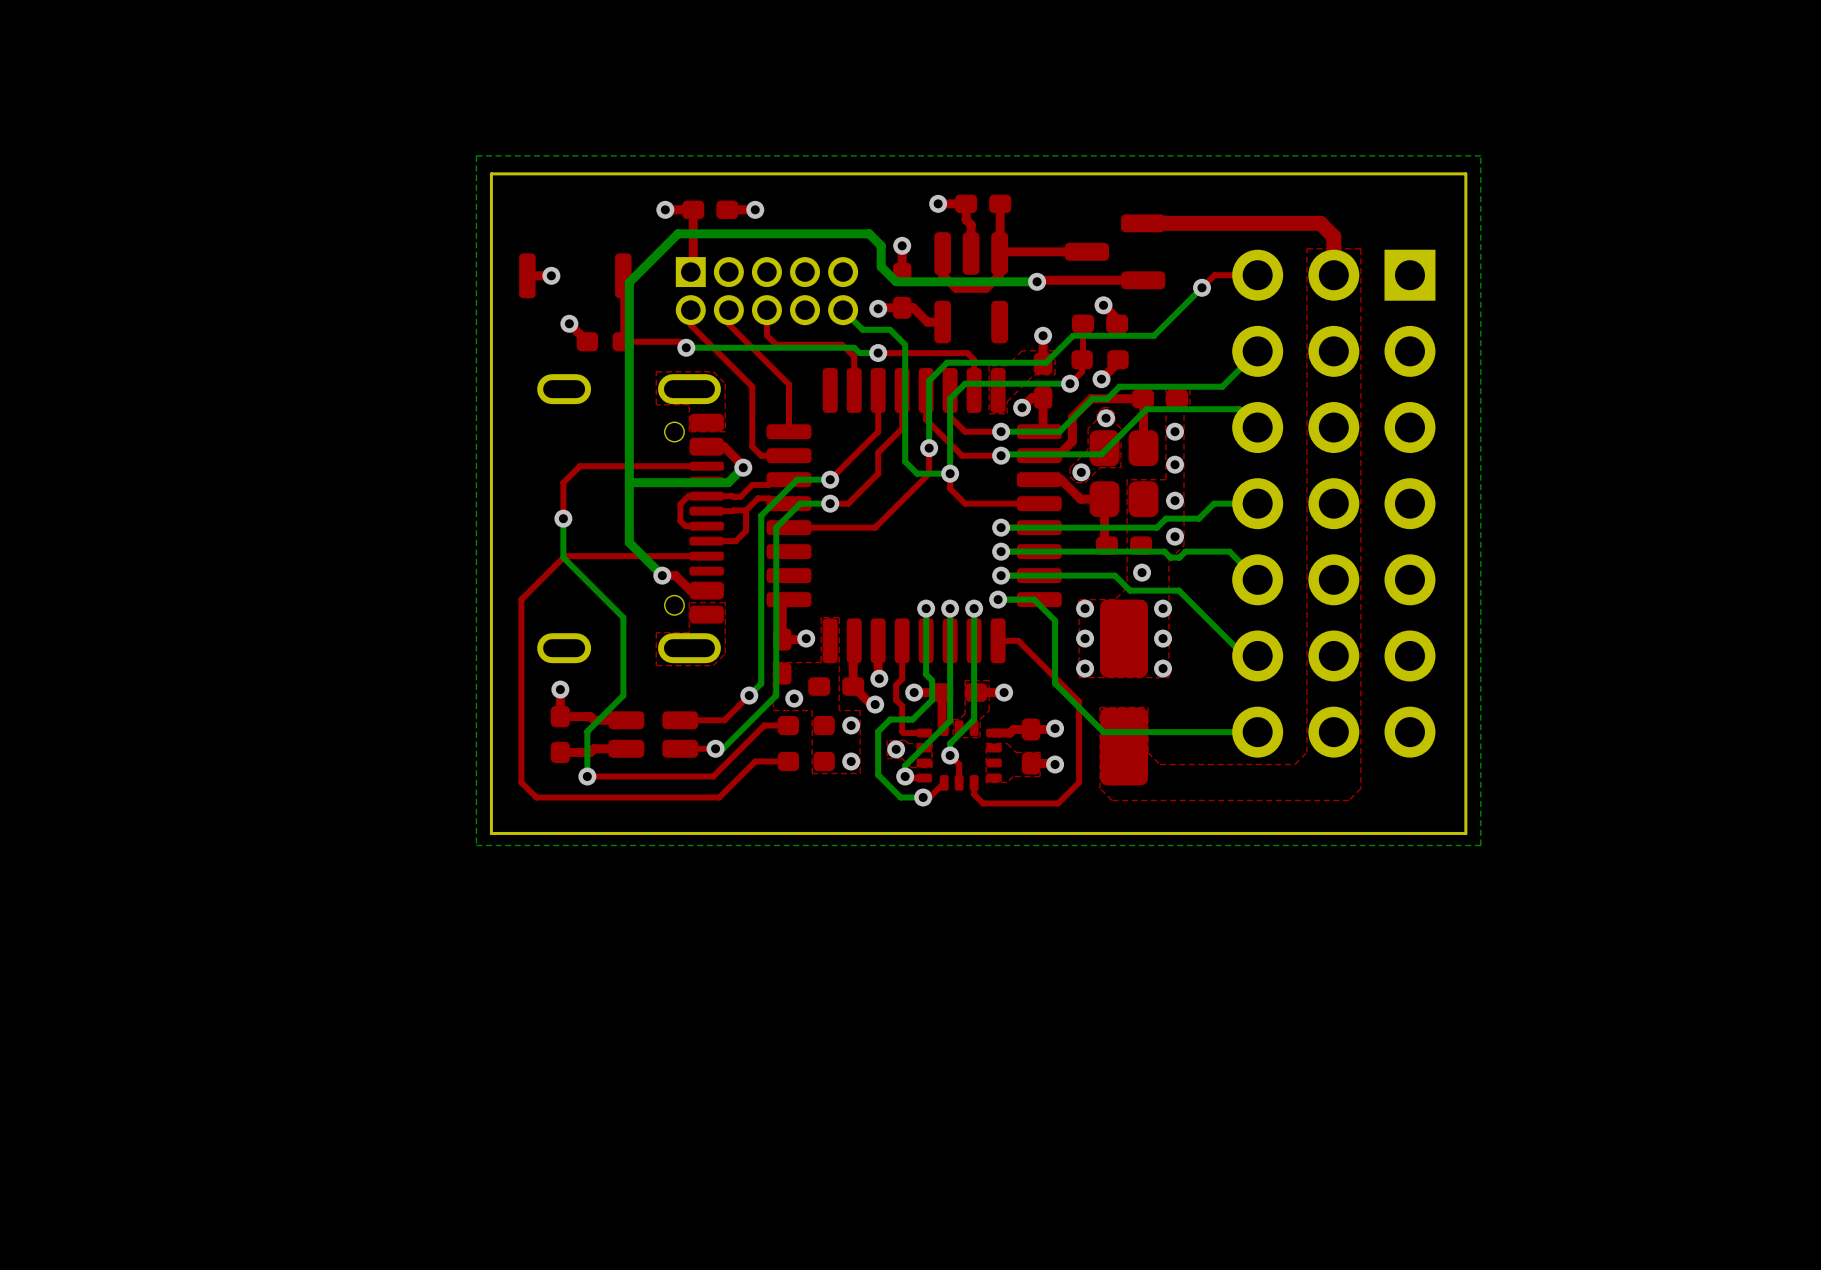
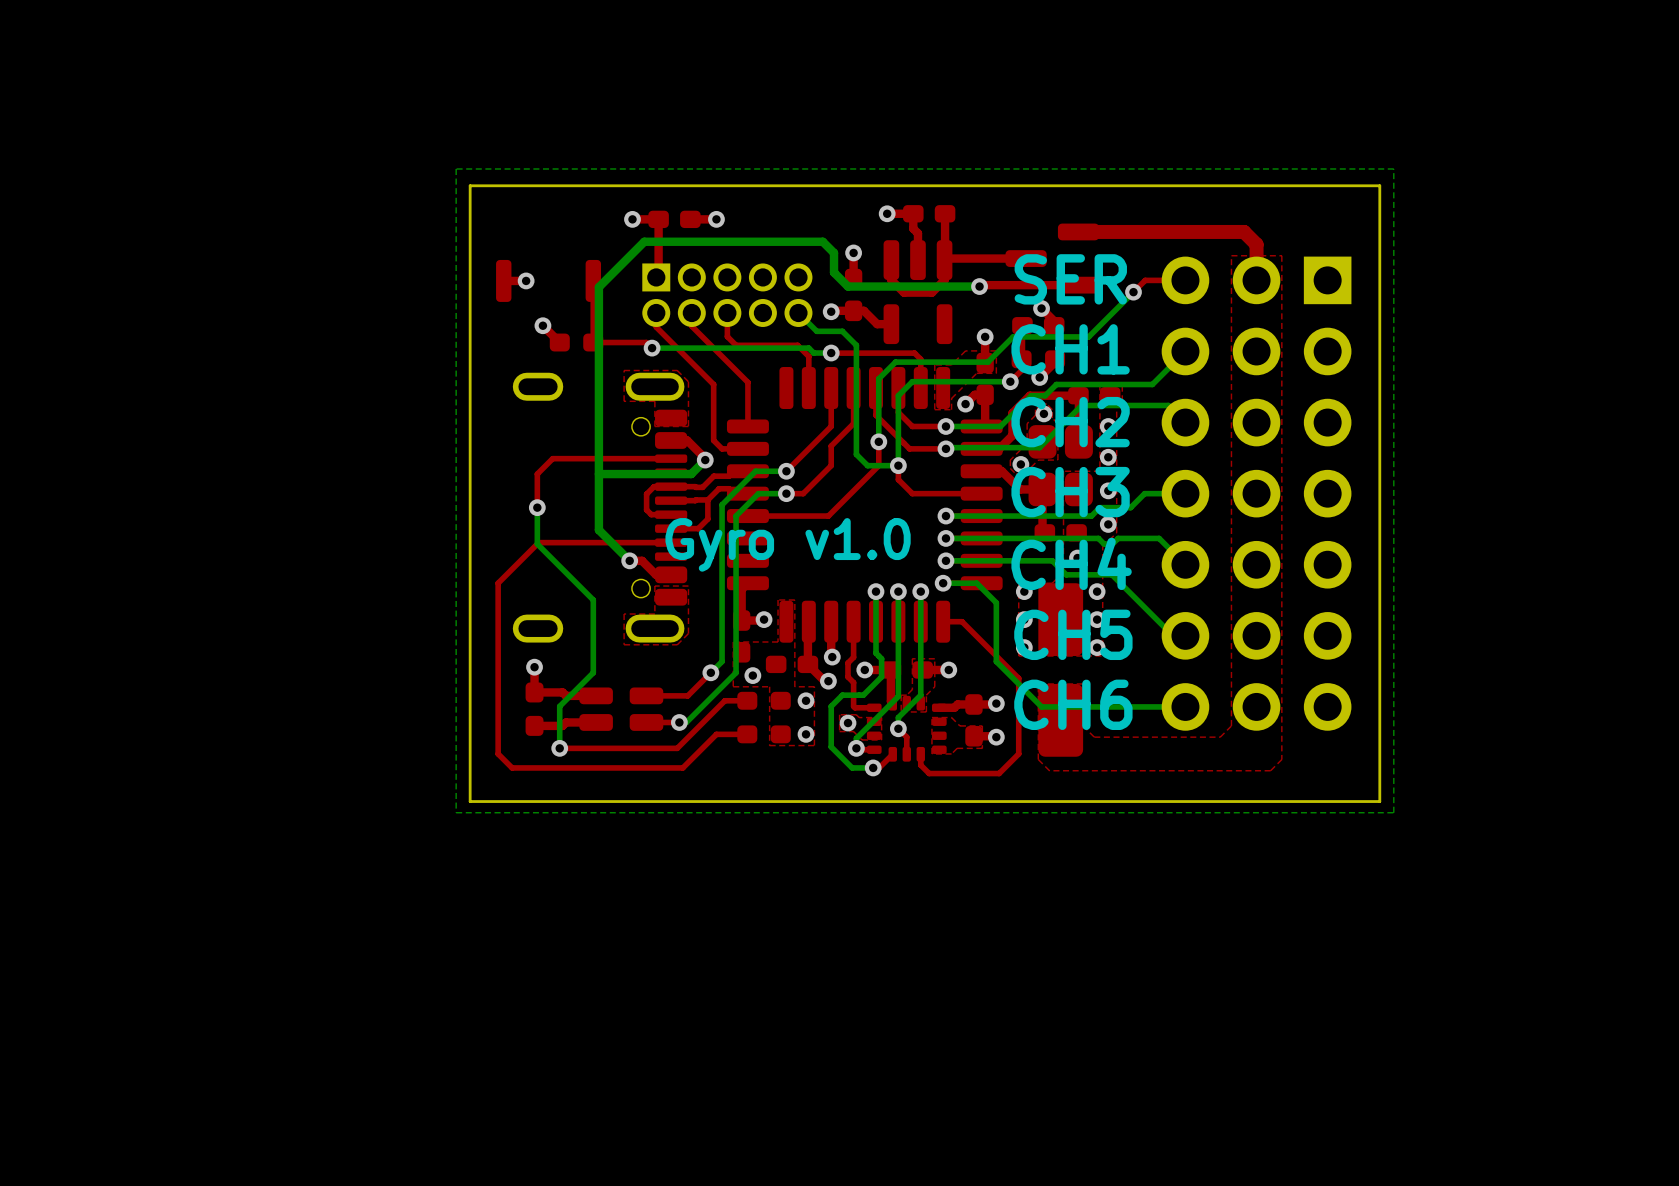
text: none -> SER (1070, 279)
text: none -> CH1 (1070, 349)
text: none -> CH2 (1070, 422)
text: none -> CH3 (1070, 492)
text: none -> Gyro v1.0 (788, 544)
text: none -> CH4 (1071, 563)
text: none -> CH5 (1073, 634)
text: none -> CH6 (1073, 704)

